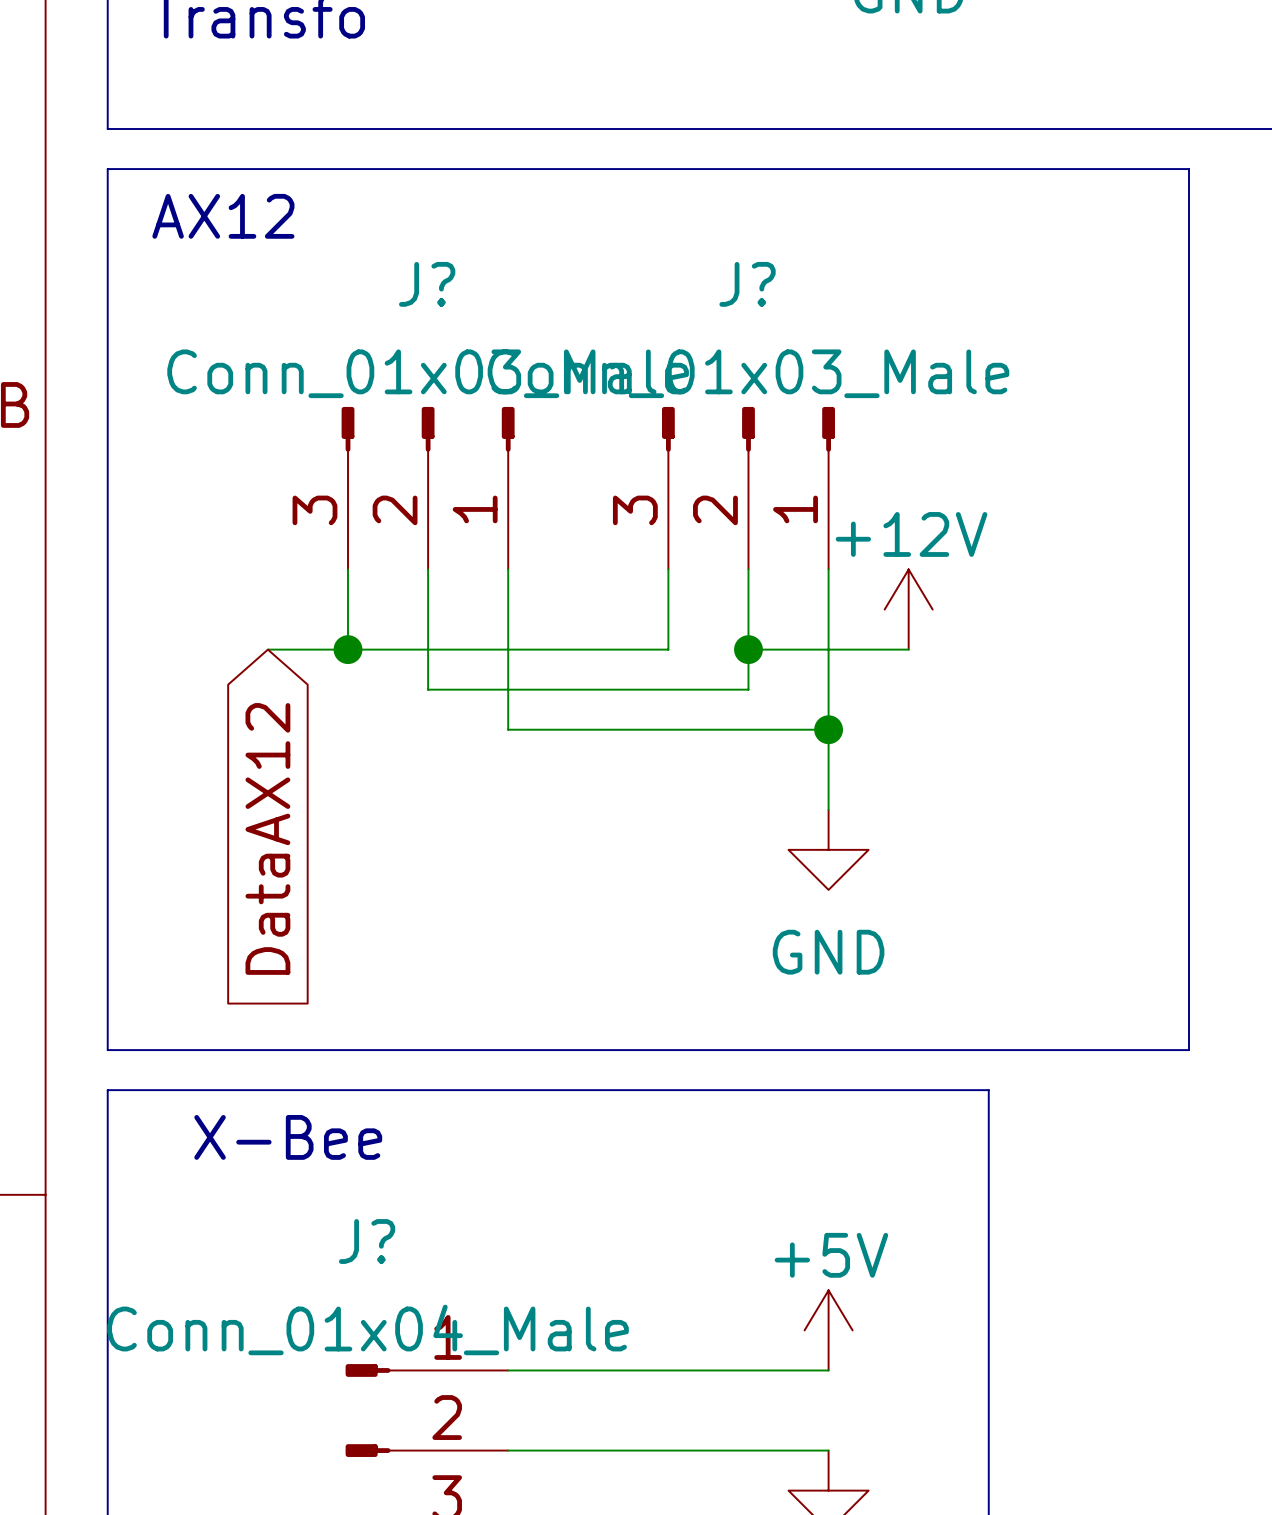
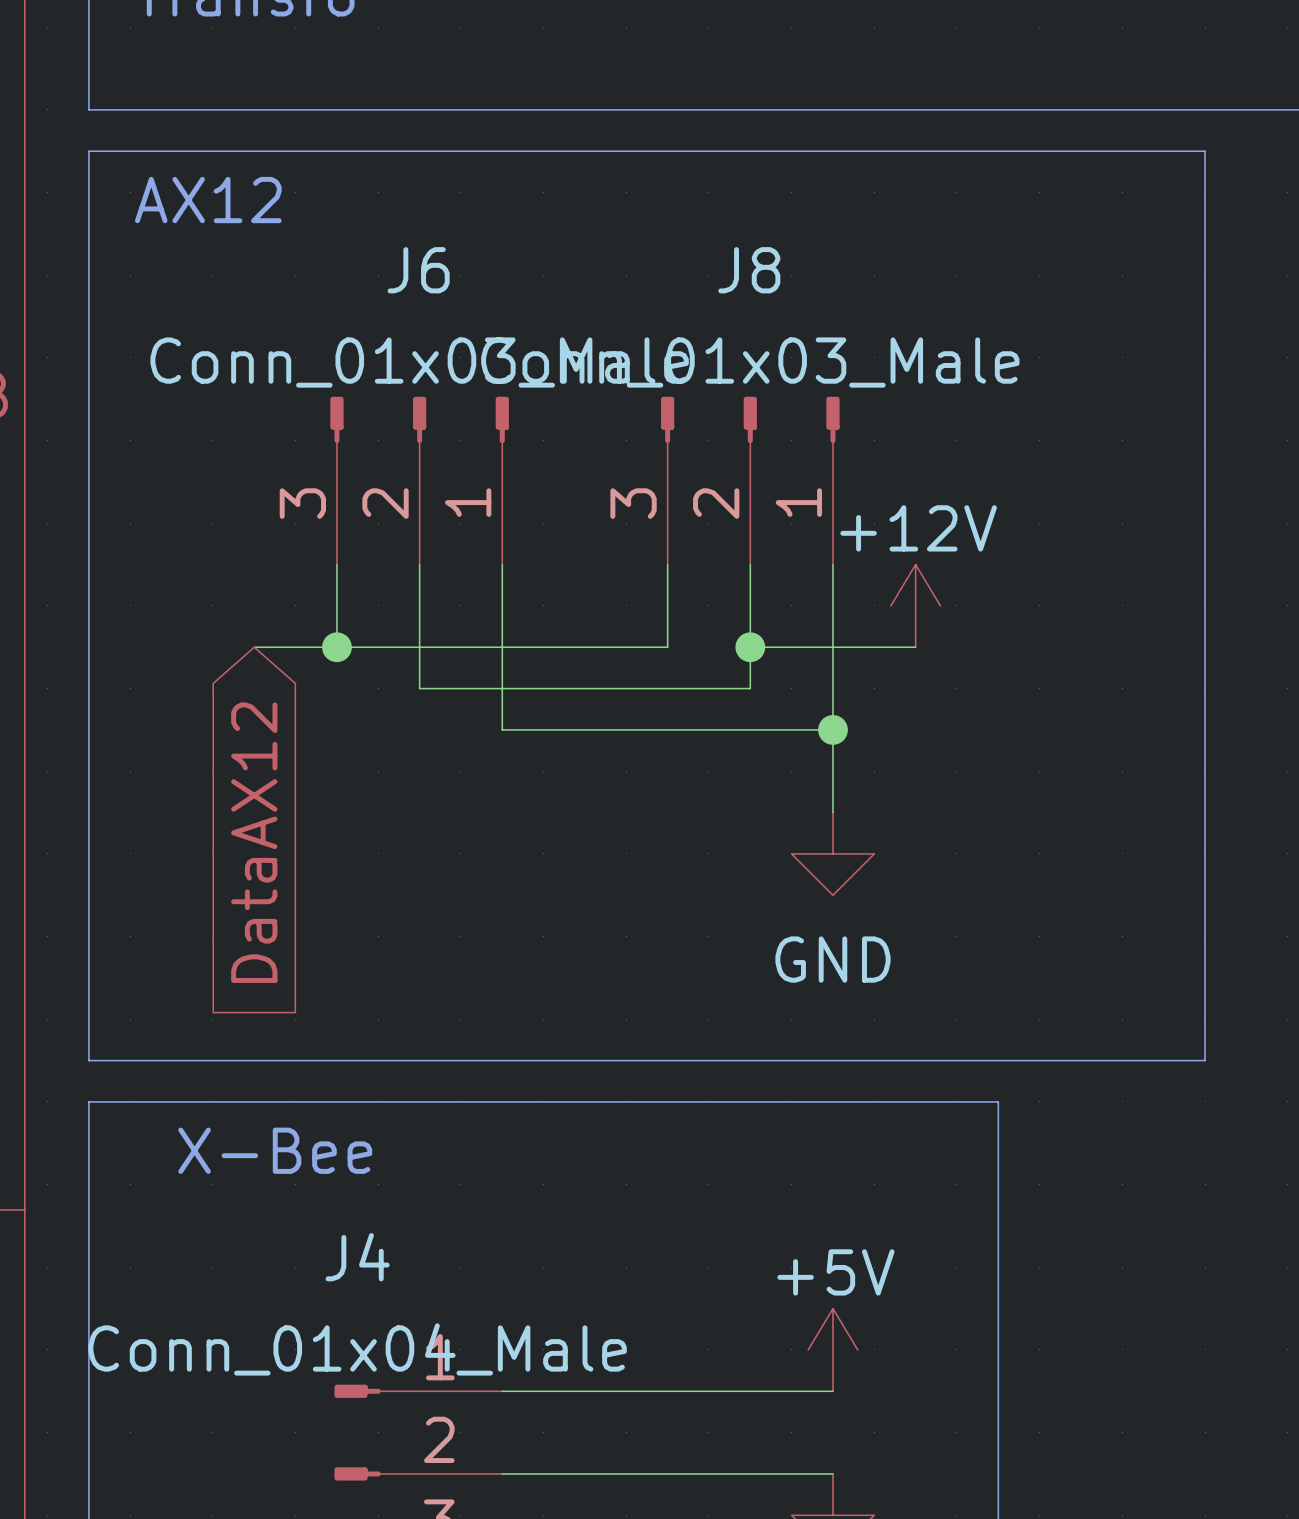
J? name: J? (427, 284) -> J6 (418, 270)
J? name: J? (747, 284) -> J8 (749, 270)
J? name: J? (367, 1241) -> J4 (357, 1257)

